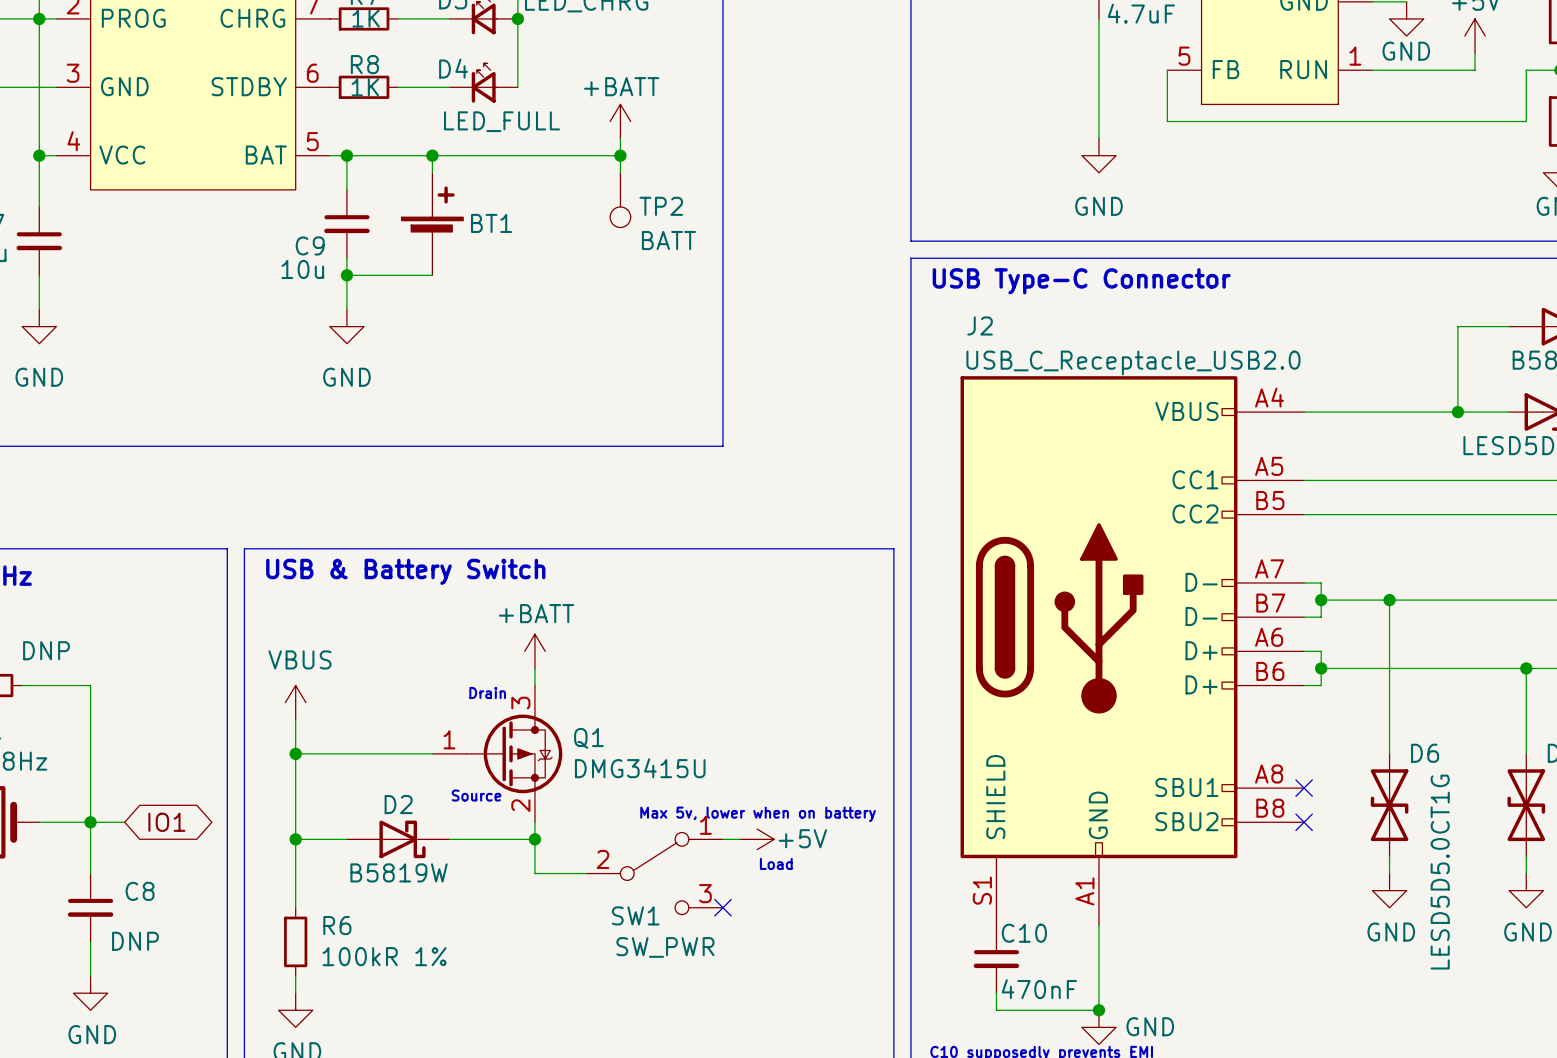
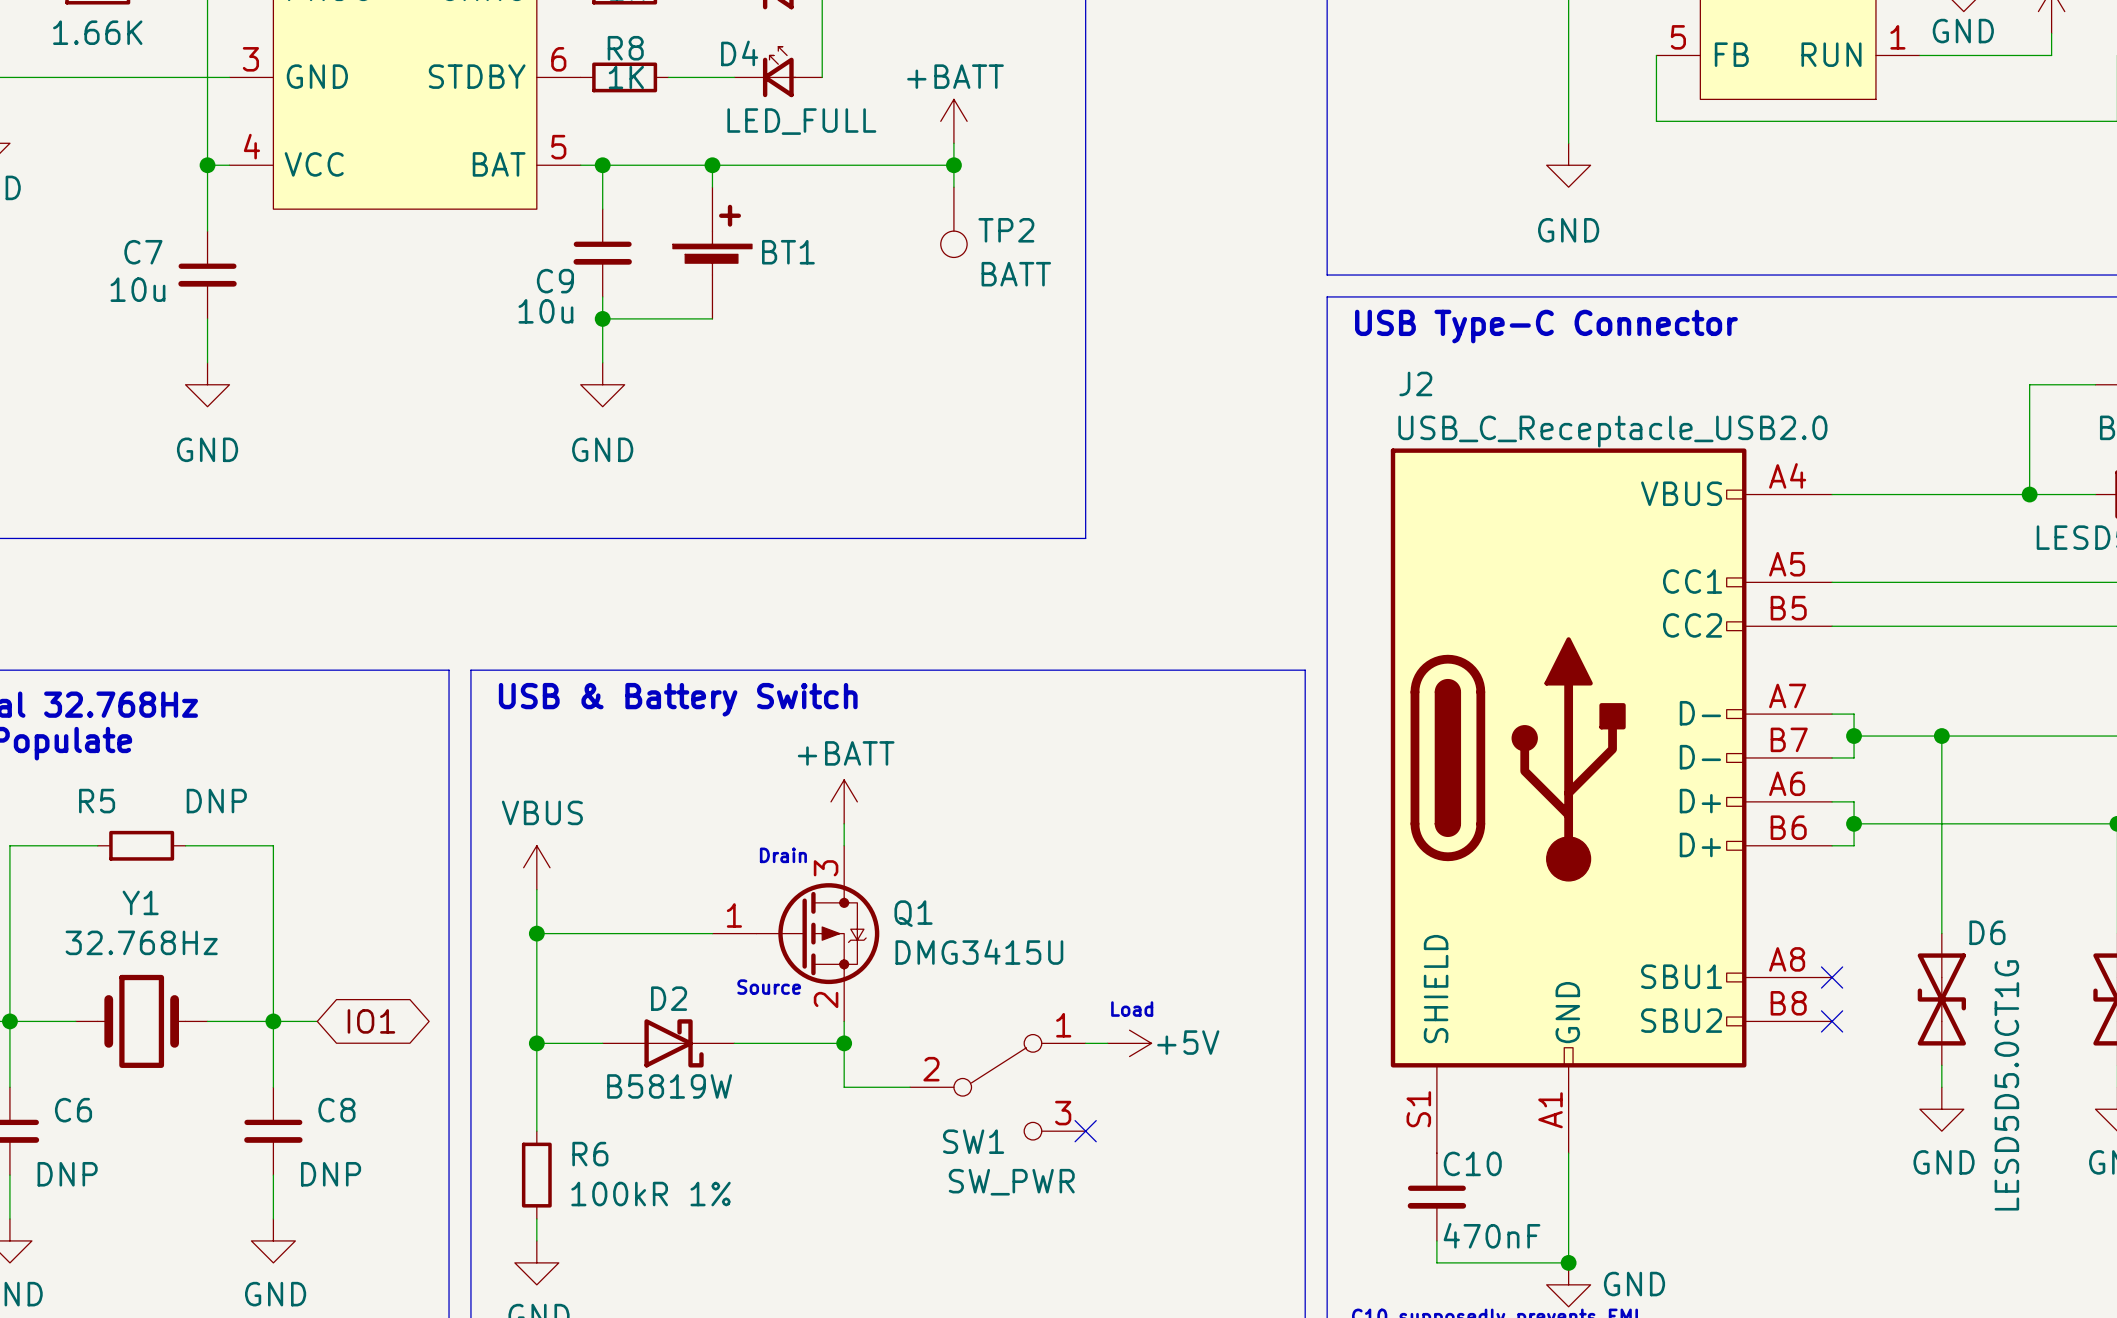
text: Max 5v, lower when on battery (758, 814) -> none
text position: Load (776, 863) -> Load (1132, 1009)

